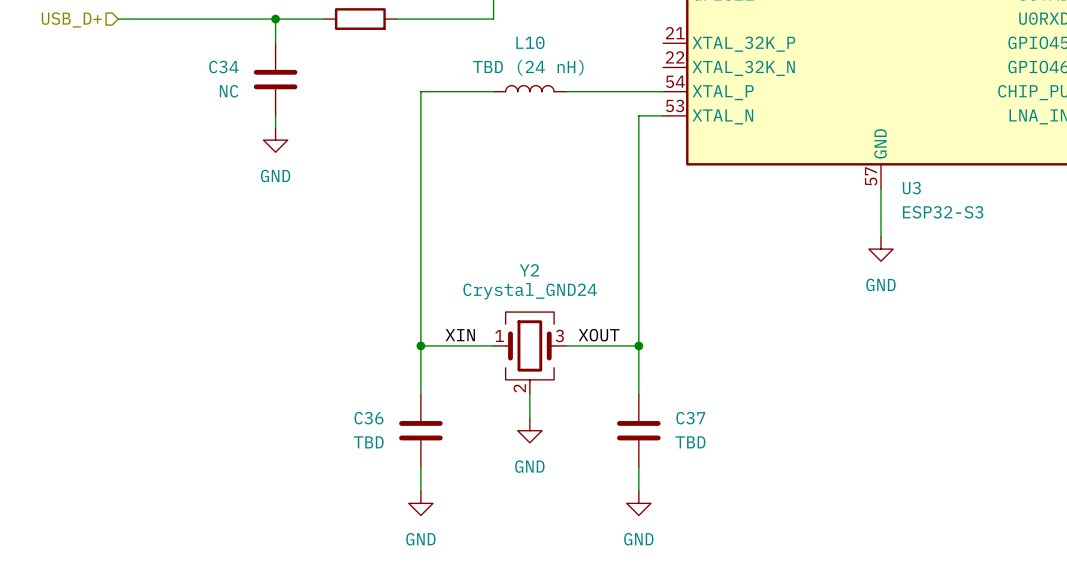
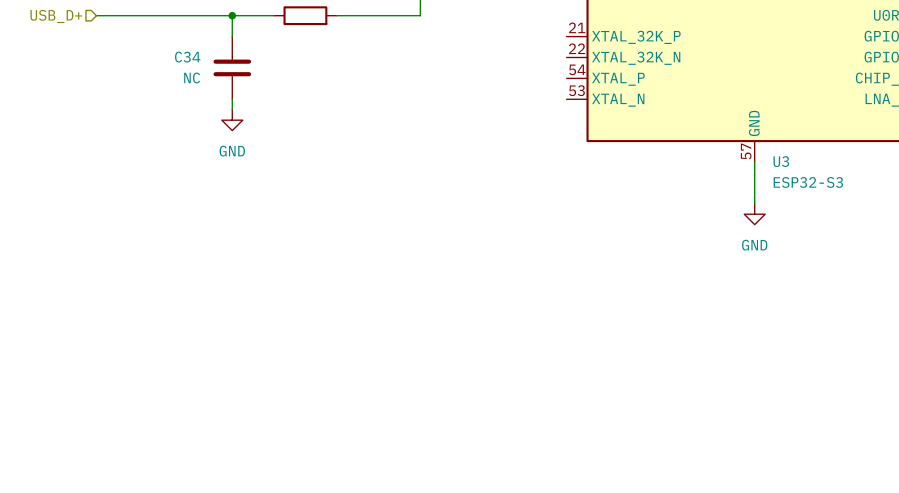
L10: TBD (24 nH) (529, 88) -> none
wire: (493, 91) (420, 91) (420, 394) -> none
wire: (566, 91) (663, 91) -> none
wire: (663, 115) (638, 115) (638, 394) -> none
label: XIN (460, 335) -> none
label: XOUT (599, 335) -> none
wire: (420, 345) (493, 345) -> none
junction: (420, 345) -> none
wire: (566, 345) (638, 345) -> none
junction: (638, 345) -> none
Y2: Crystal_GND24 (529, 353) -> none
wire: (529, 394) (529, 418) -> none
C36: TBD (420, 430) -> none
power symbol: GND (529, 430) -> none
C37: TBD (638, 430) -> none
wire: (420, 467) (420, 491) -> none
wire: (638, 467) (638, 491) -> none
power symbol: GND (420, 503) -> none
power symbol: GND (638, 503) -> none

